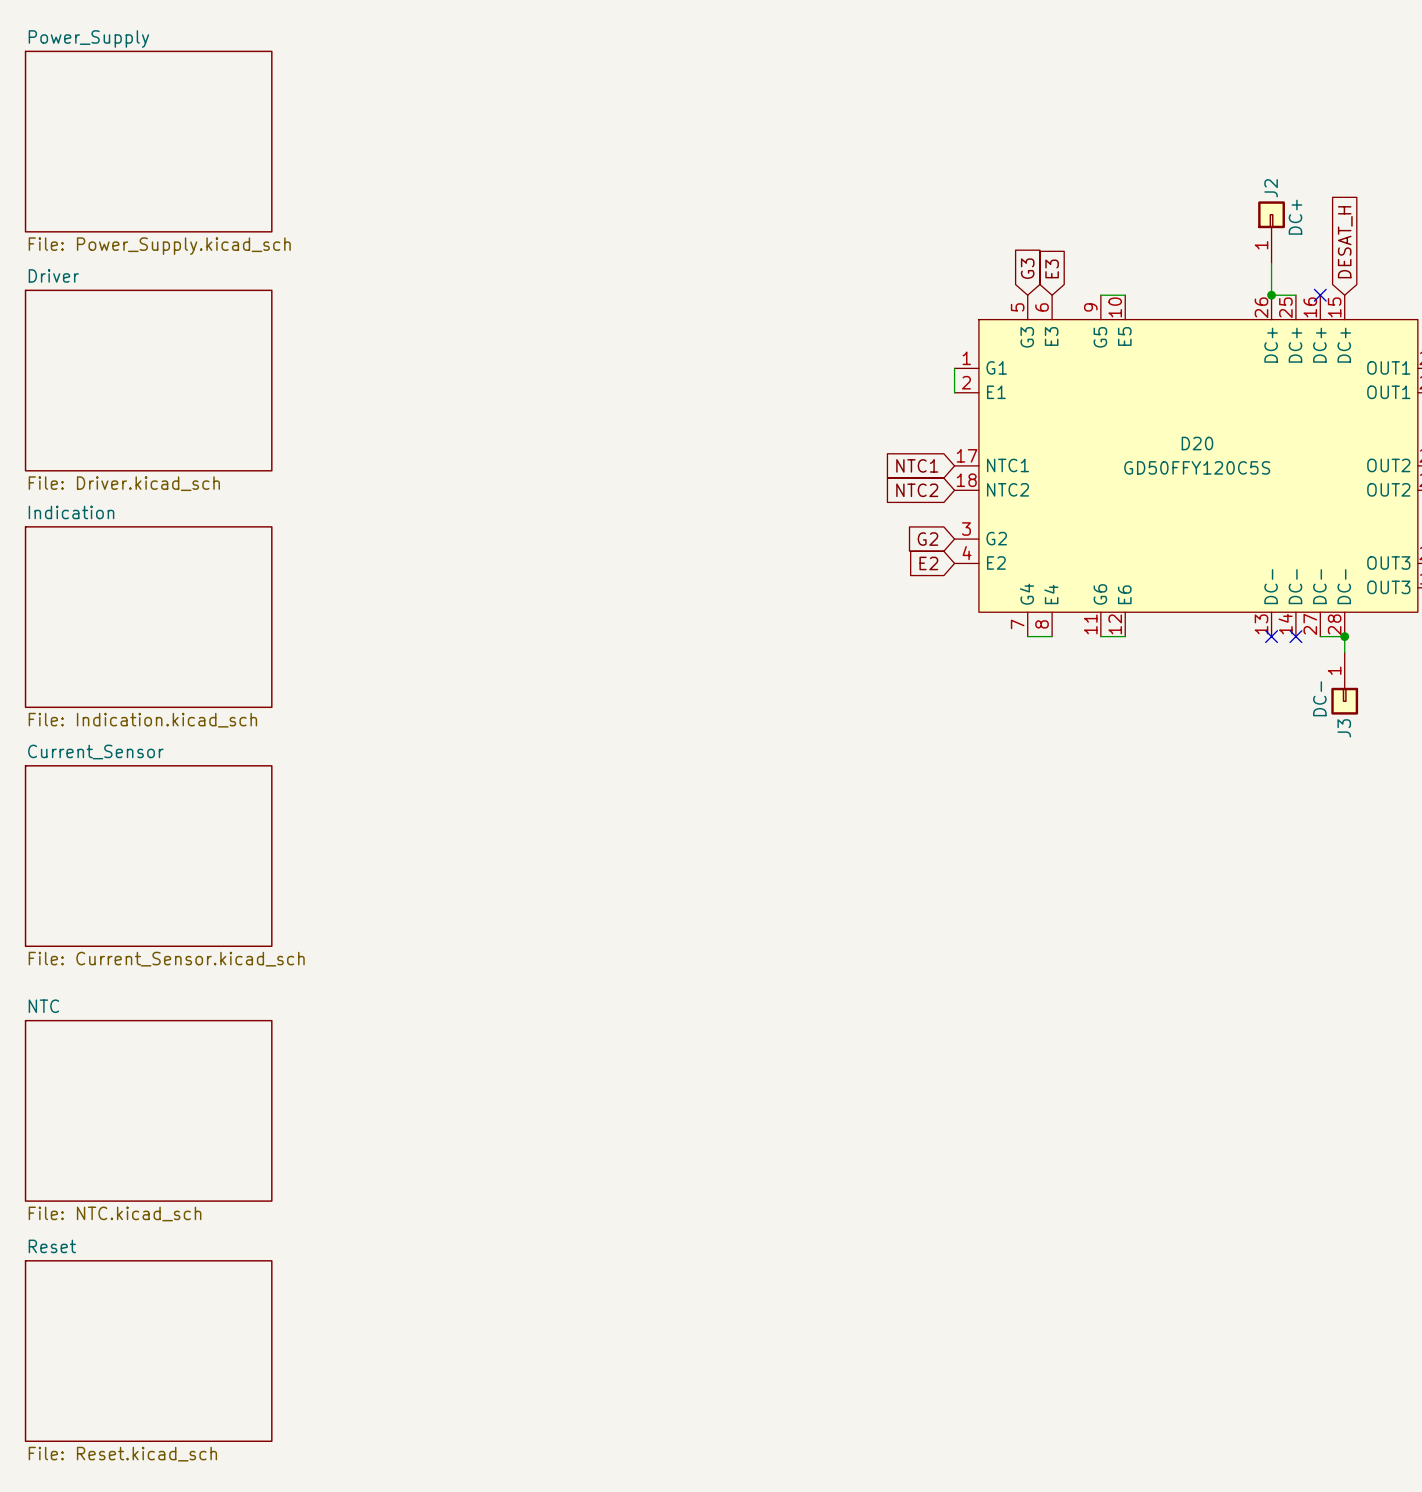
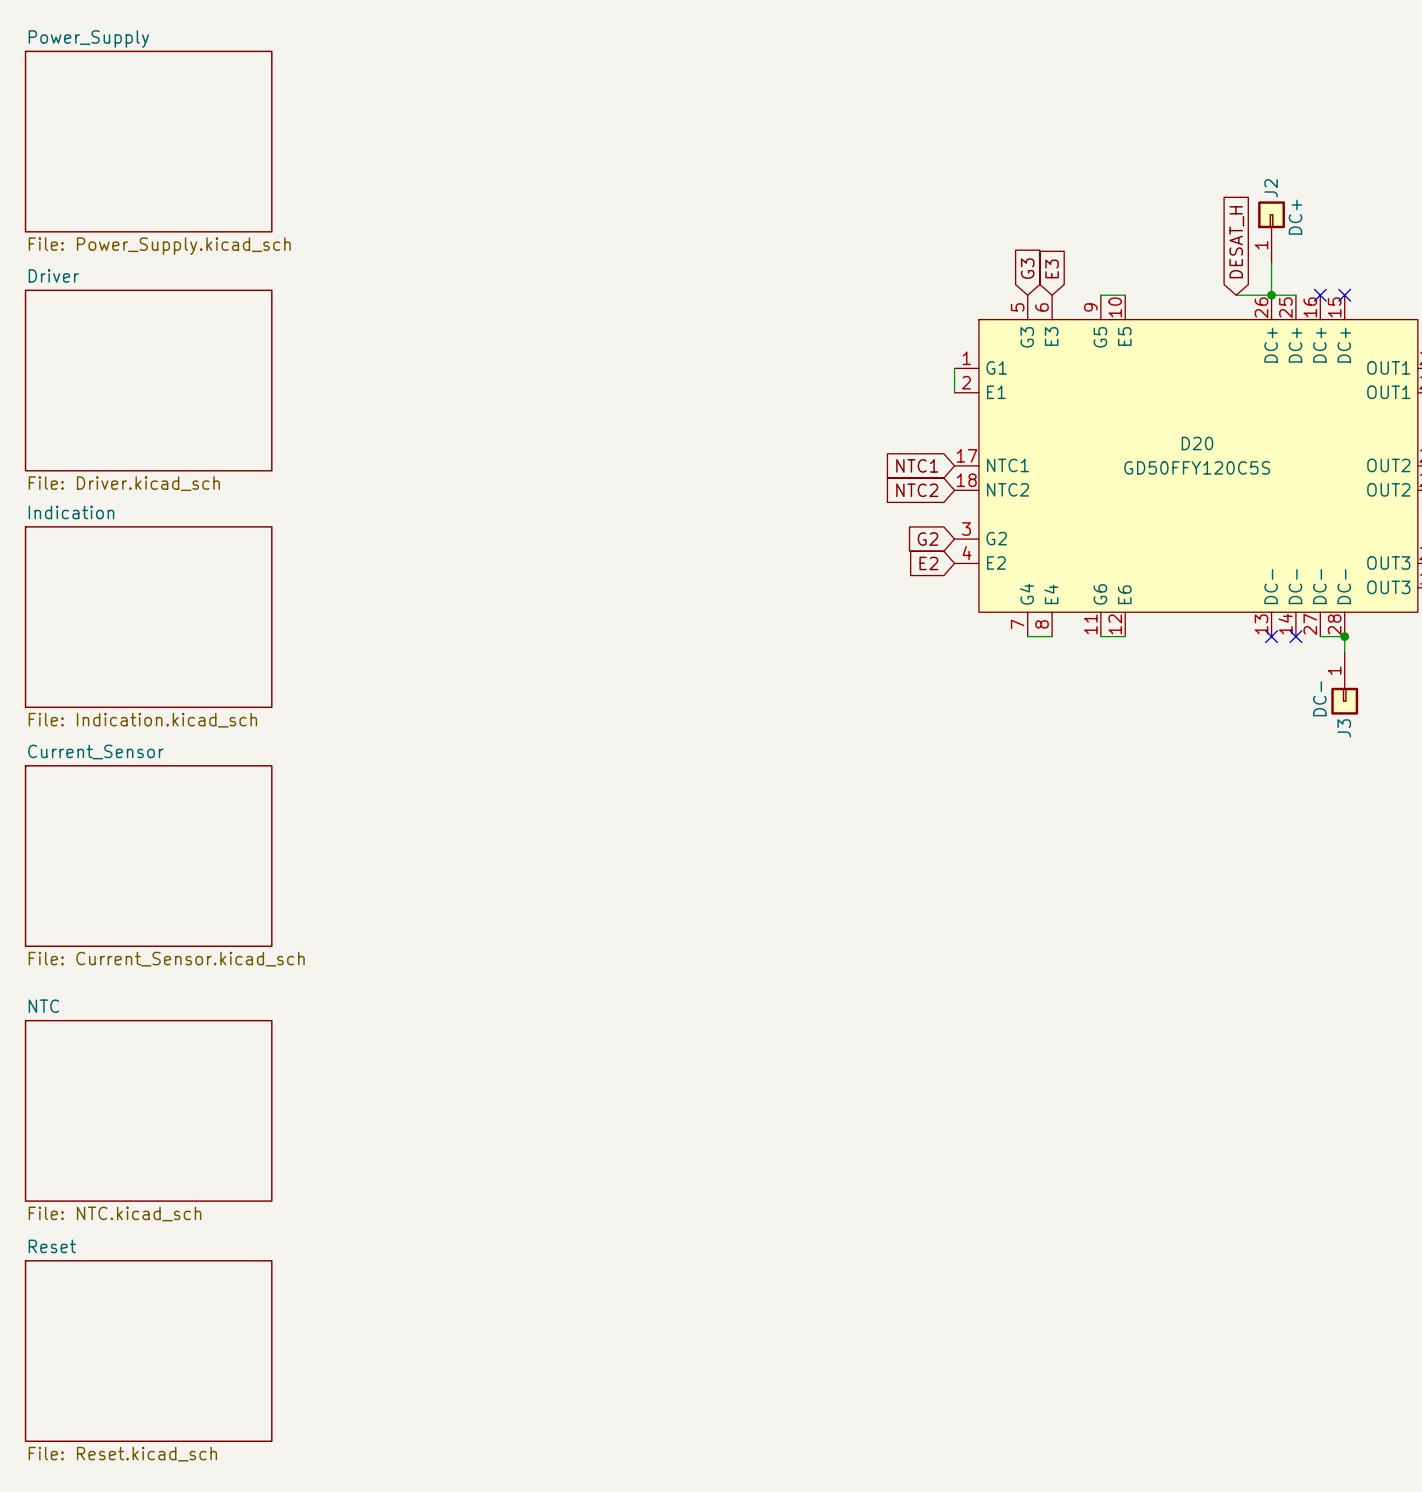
global label position: DESAT_H (1345, 242) -> DESAT_H (1236, 242)
wire: none -> (1236, 295) (1271, 295)
no-connect mark: none -> (1344, 295)

